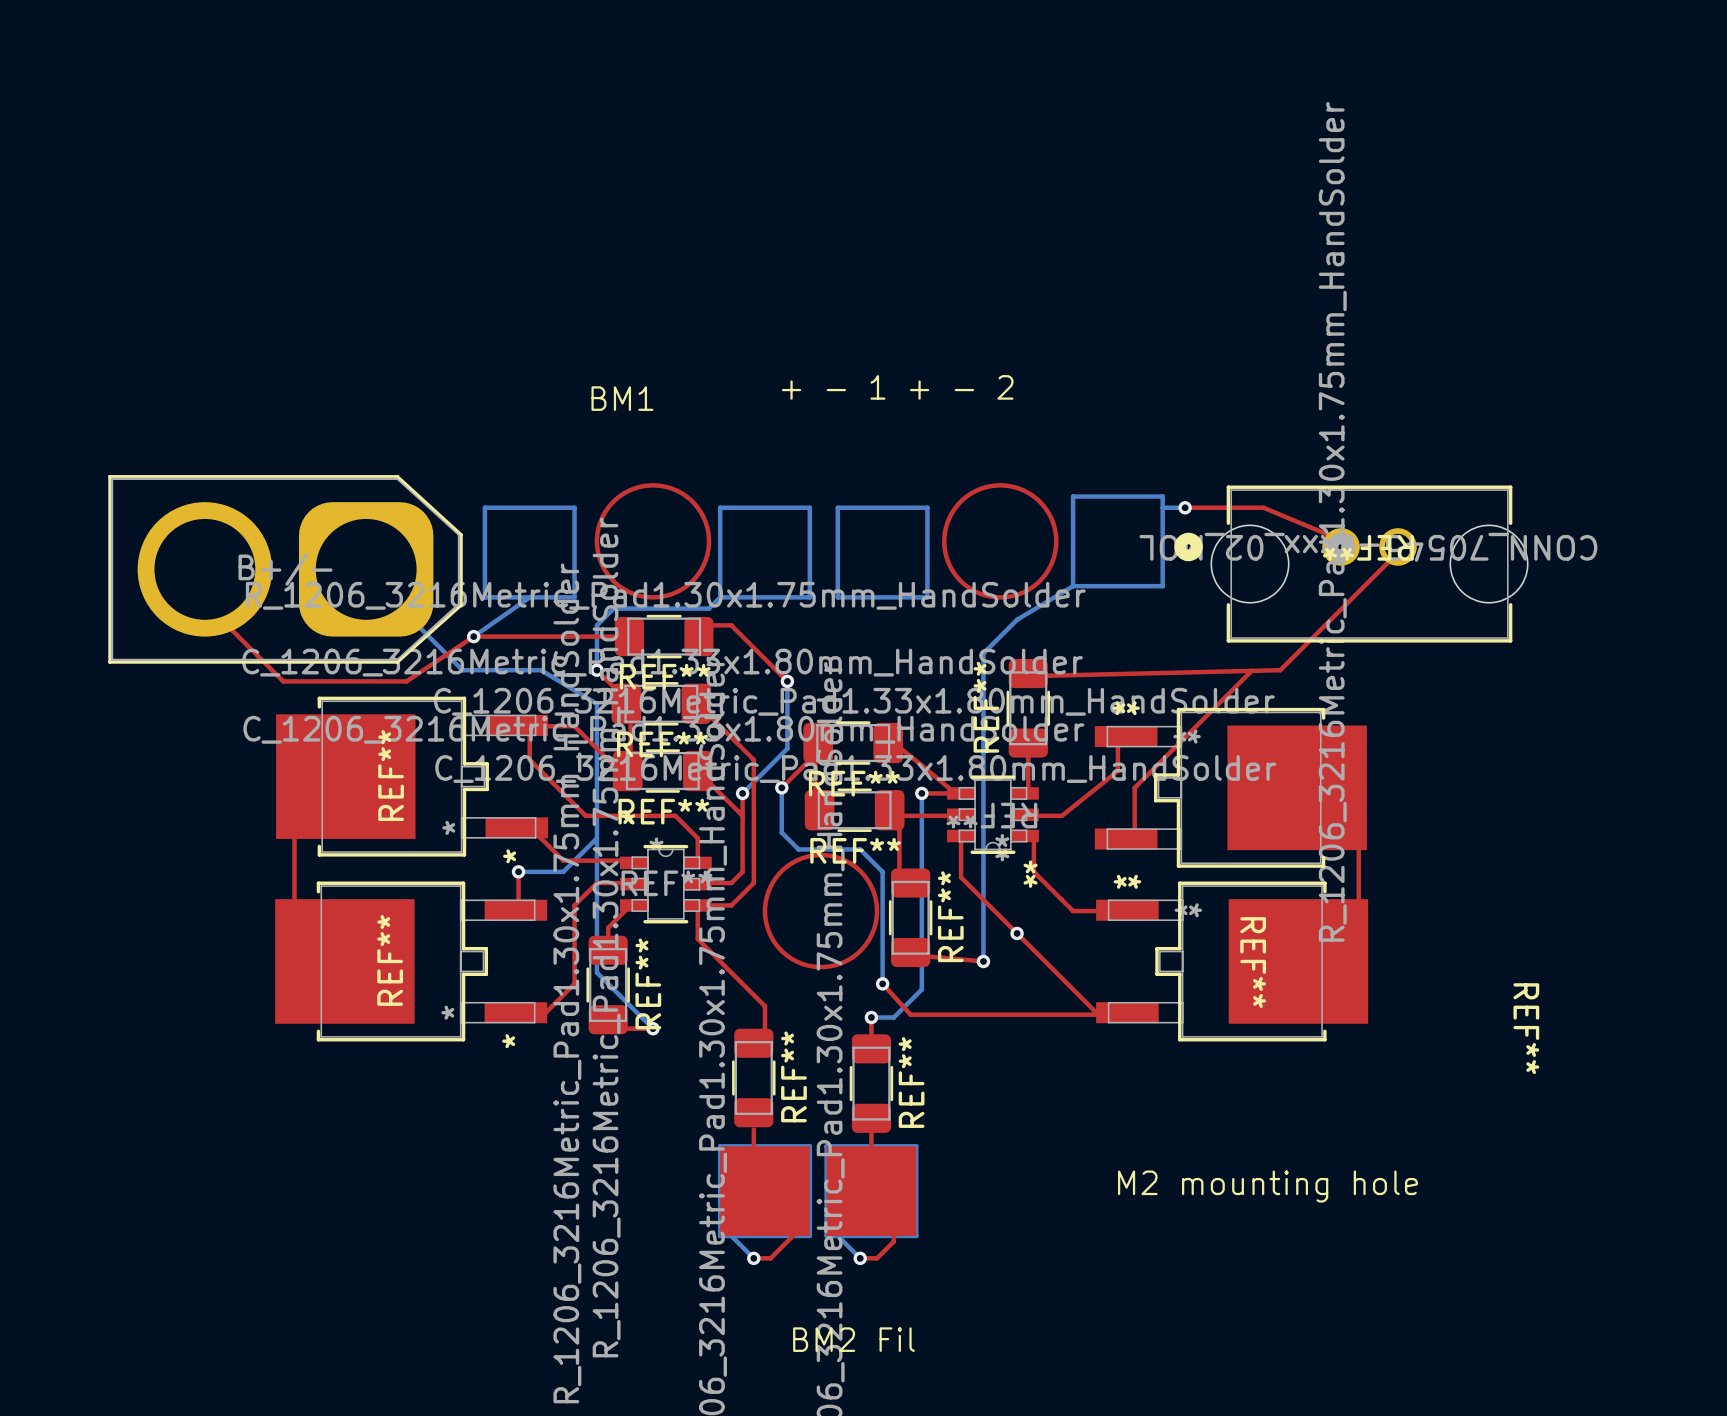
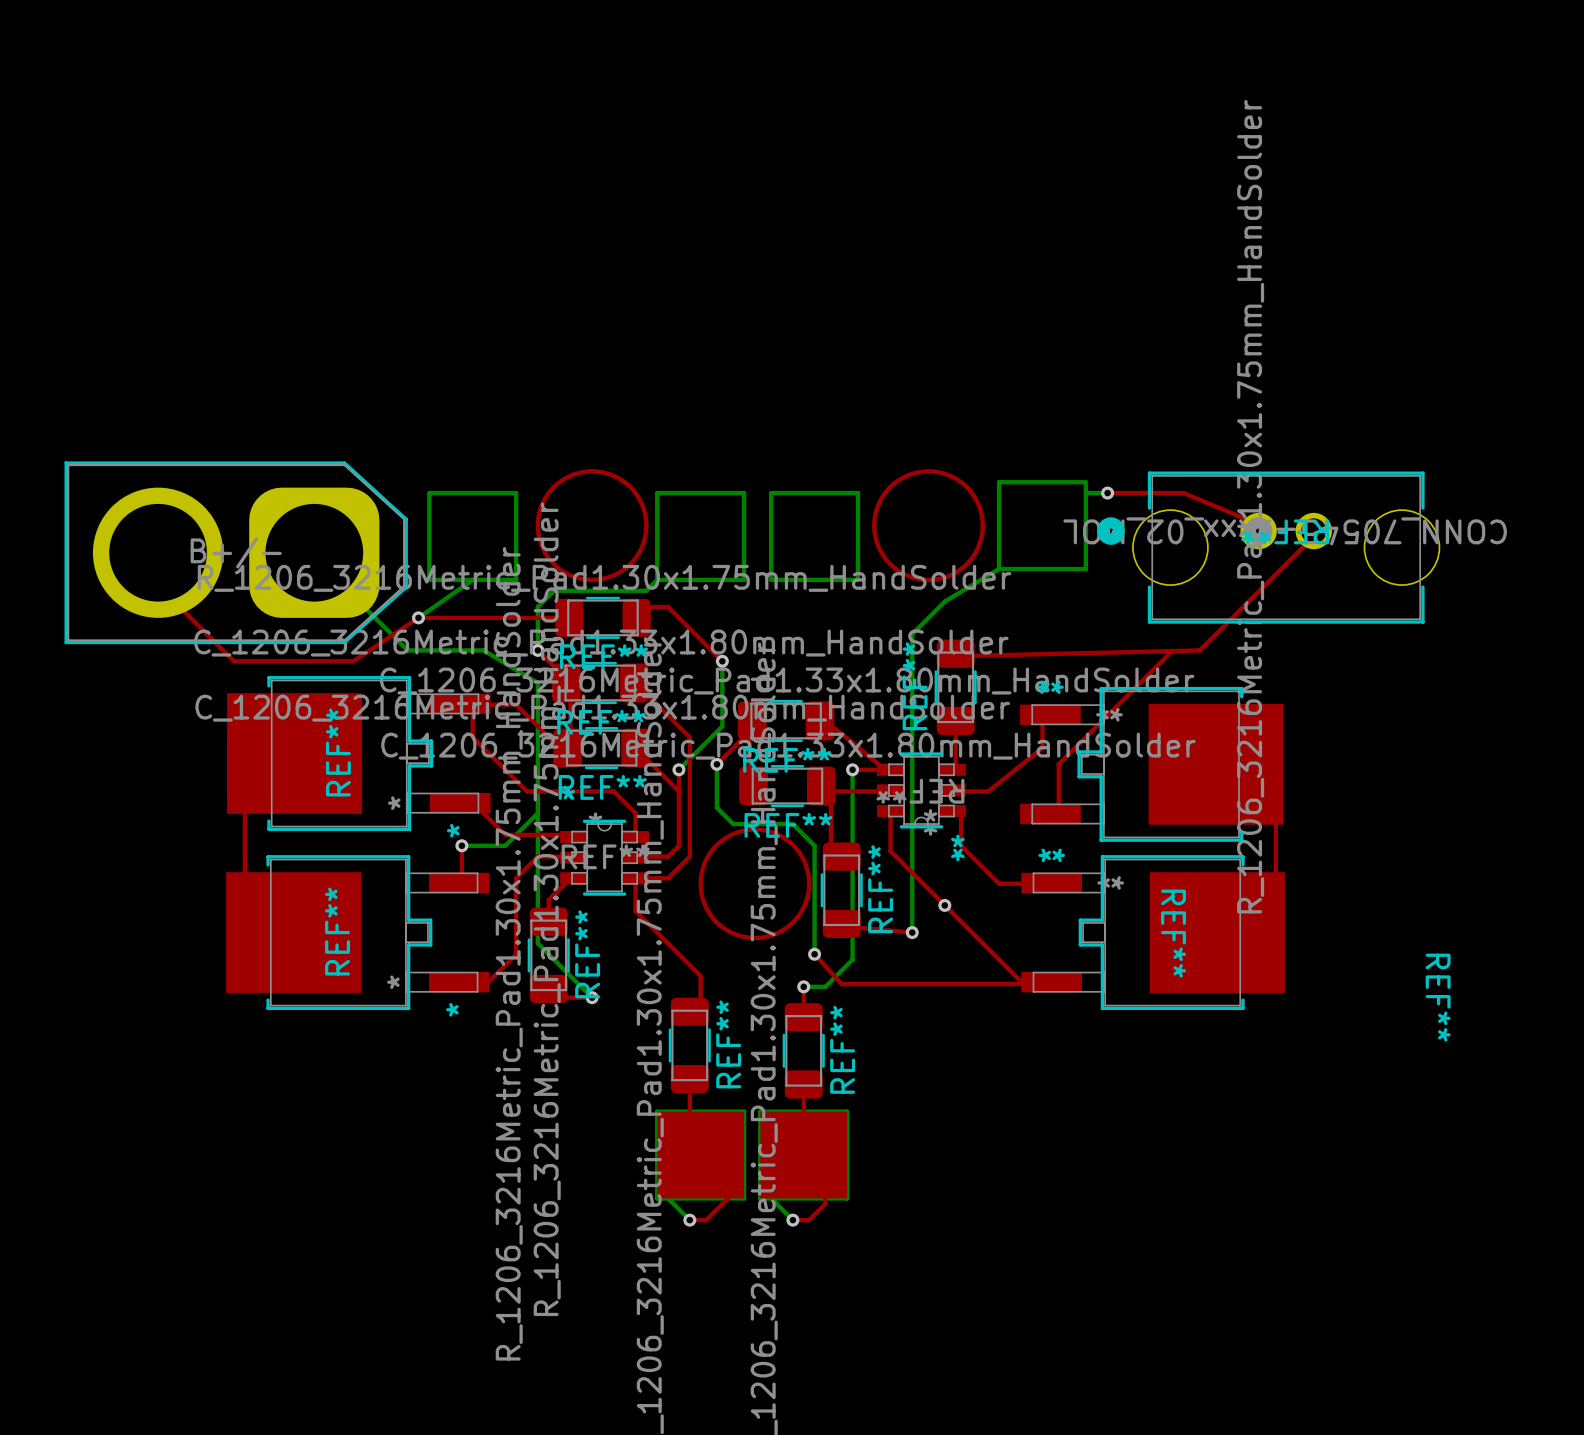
text: + - 1 + - 2 (897, 387) -> none
text: BM1 (622, 398) -> none
text: M2 mounting hole (1267, 1186) -> none
text: BM2 Fil (853, 1339) -> none

